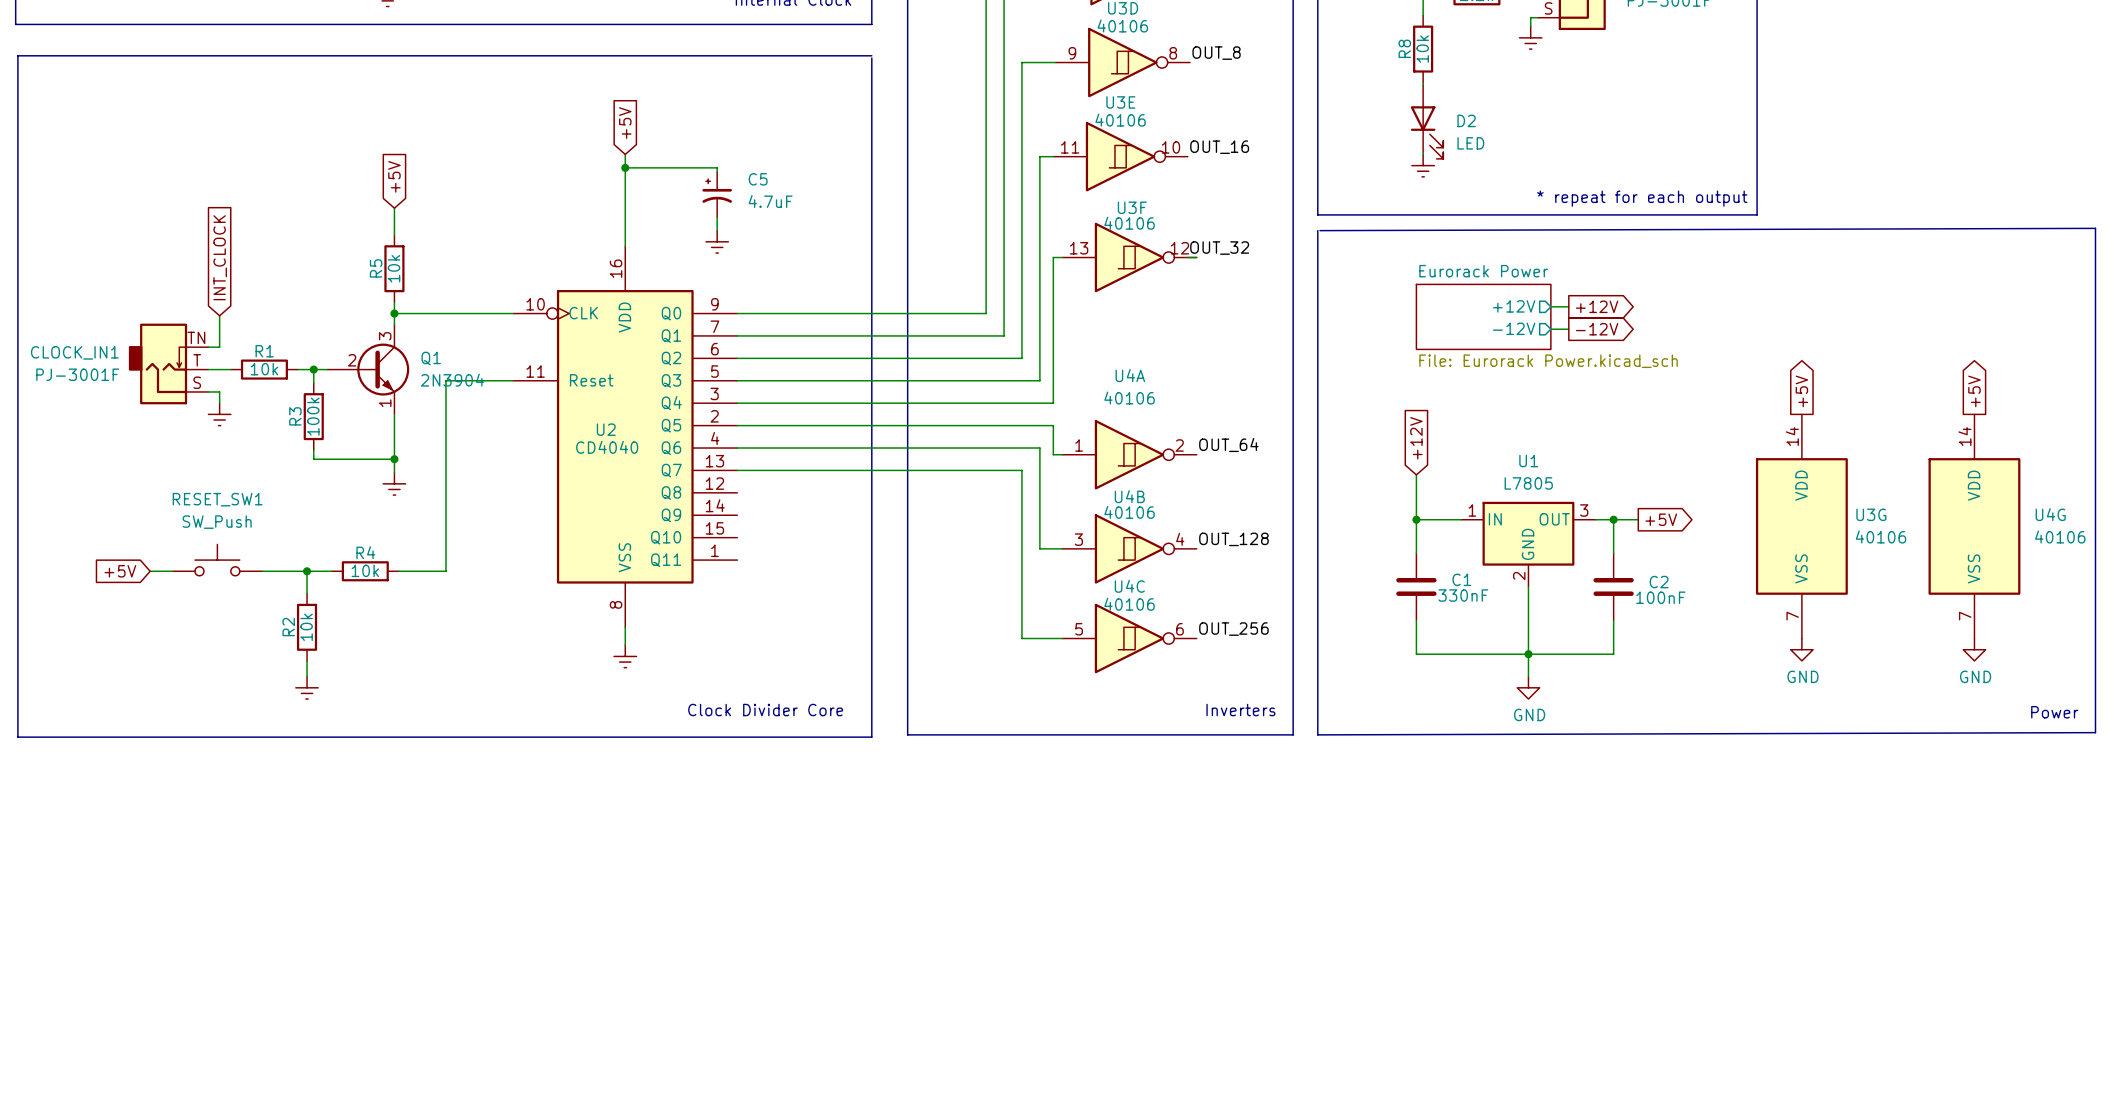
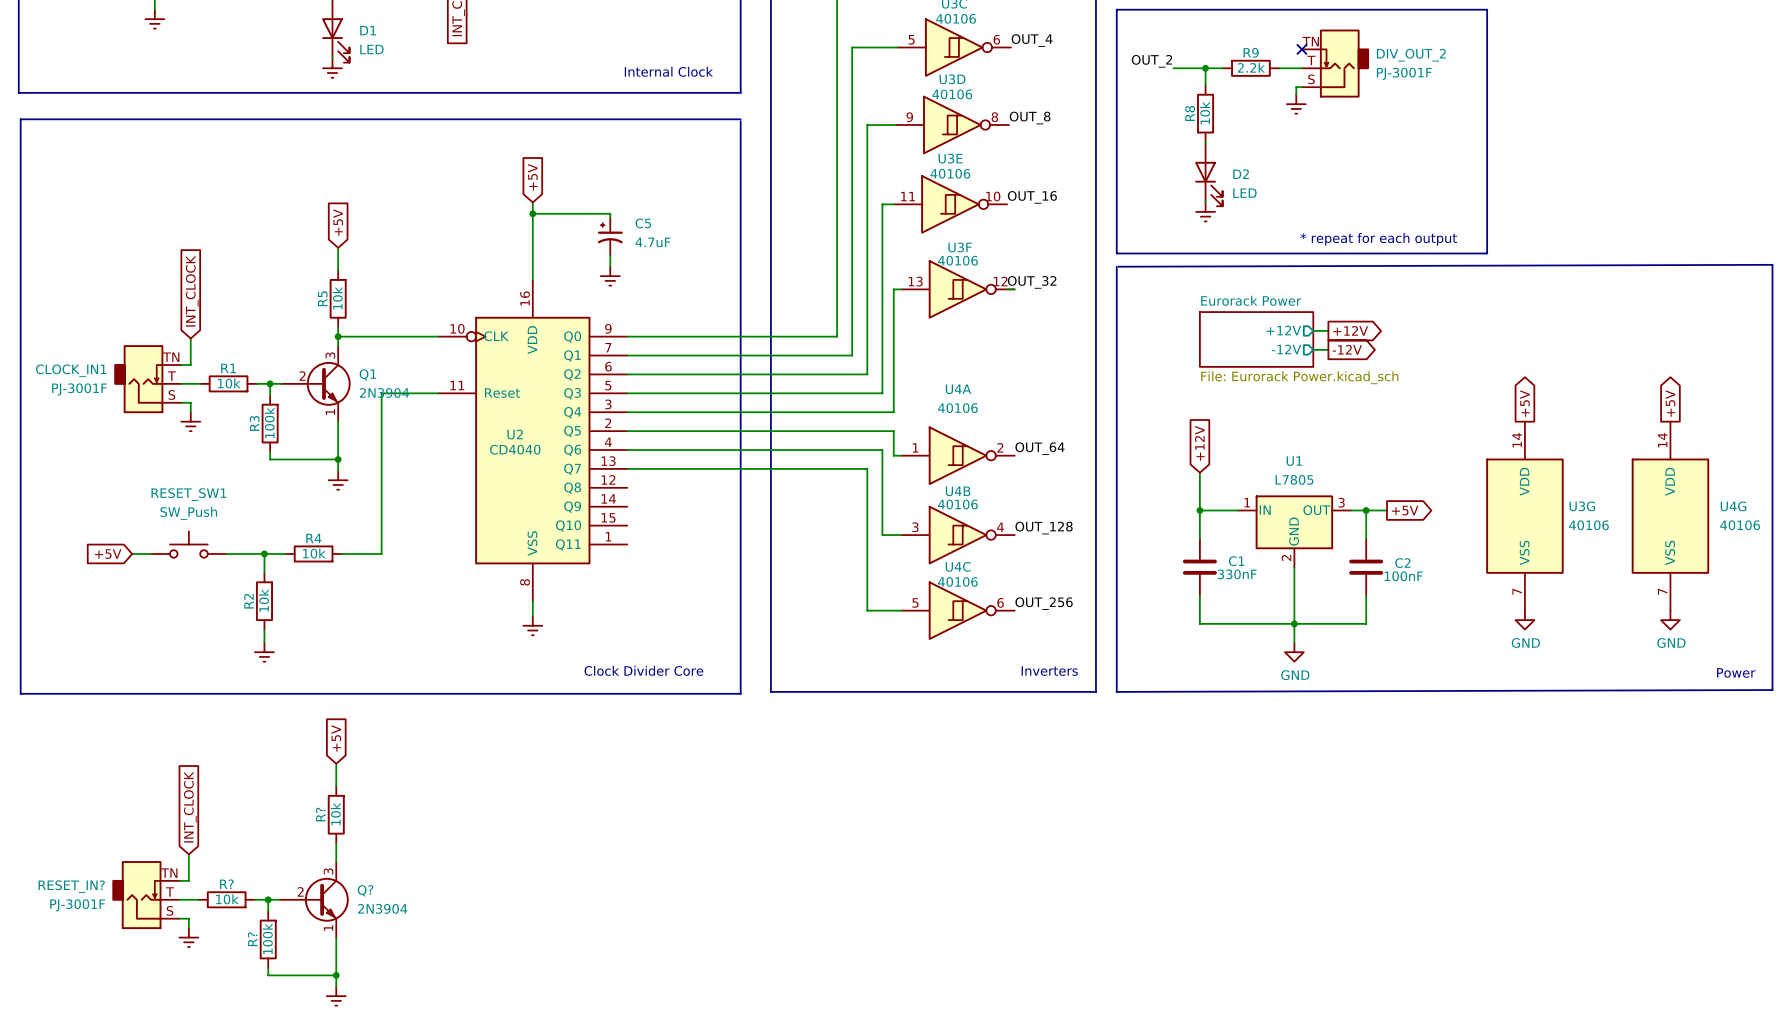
global label: none -> +5V (336, 738)
wire: none -> (336, 763) (336, 786)
global label: none -> INT_CLOCK (190, 807)
R?: none -> 10k (336, 814)
wire: none -> (336, 843) (336, 861)
wire: none -> (188, 854) (188, 880) (179, 880)
RESET_IN?: none -> PJ-3001F (145, 895)
wire: none -> (179, 899) (198, 899)
R?: none -> 10k (226, 899)
wire: none -> (255, 899) (279, 899)
wire: none -> (268, 899) (268, 911)
junction: none -> (268, 899)
Q?: none -> 2N3904 (314, 899)
wire: none -> (179, 918) (188, 918) (188, 928)
power symbol: none -> (188, 937)
wire: none -> (336, 937) (336, 986)
R?: none -> 100k (268, 939)
wire: none -> (268, 967) (268, 975) (336, 975)
junction: none -> (336, 975)
power symbol: none -> (336, 996)

